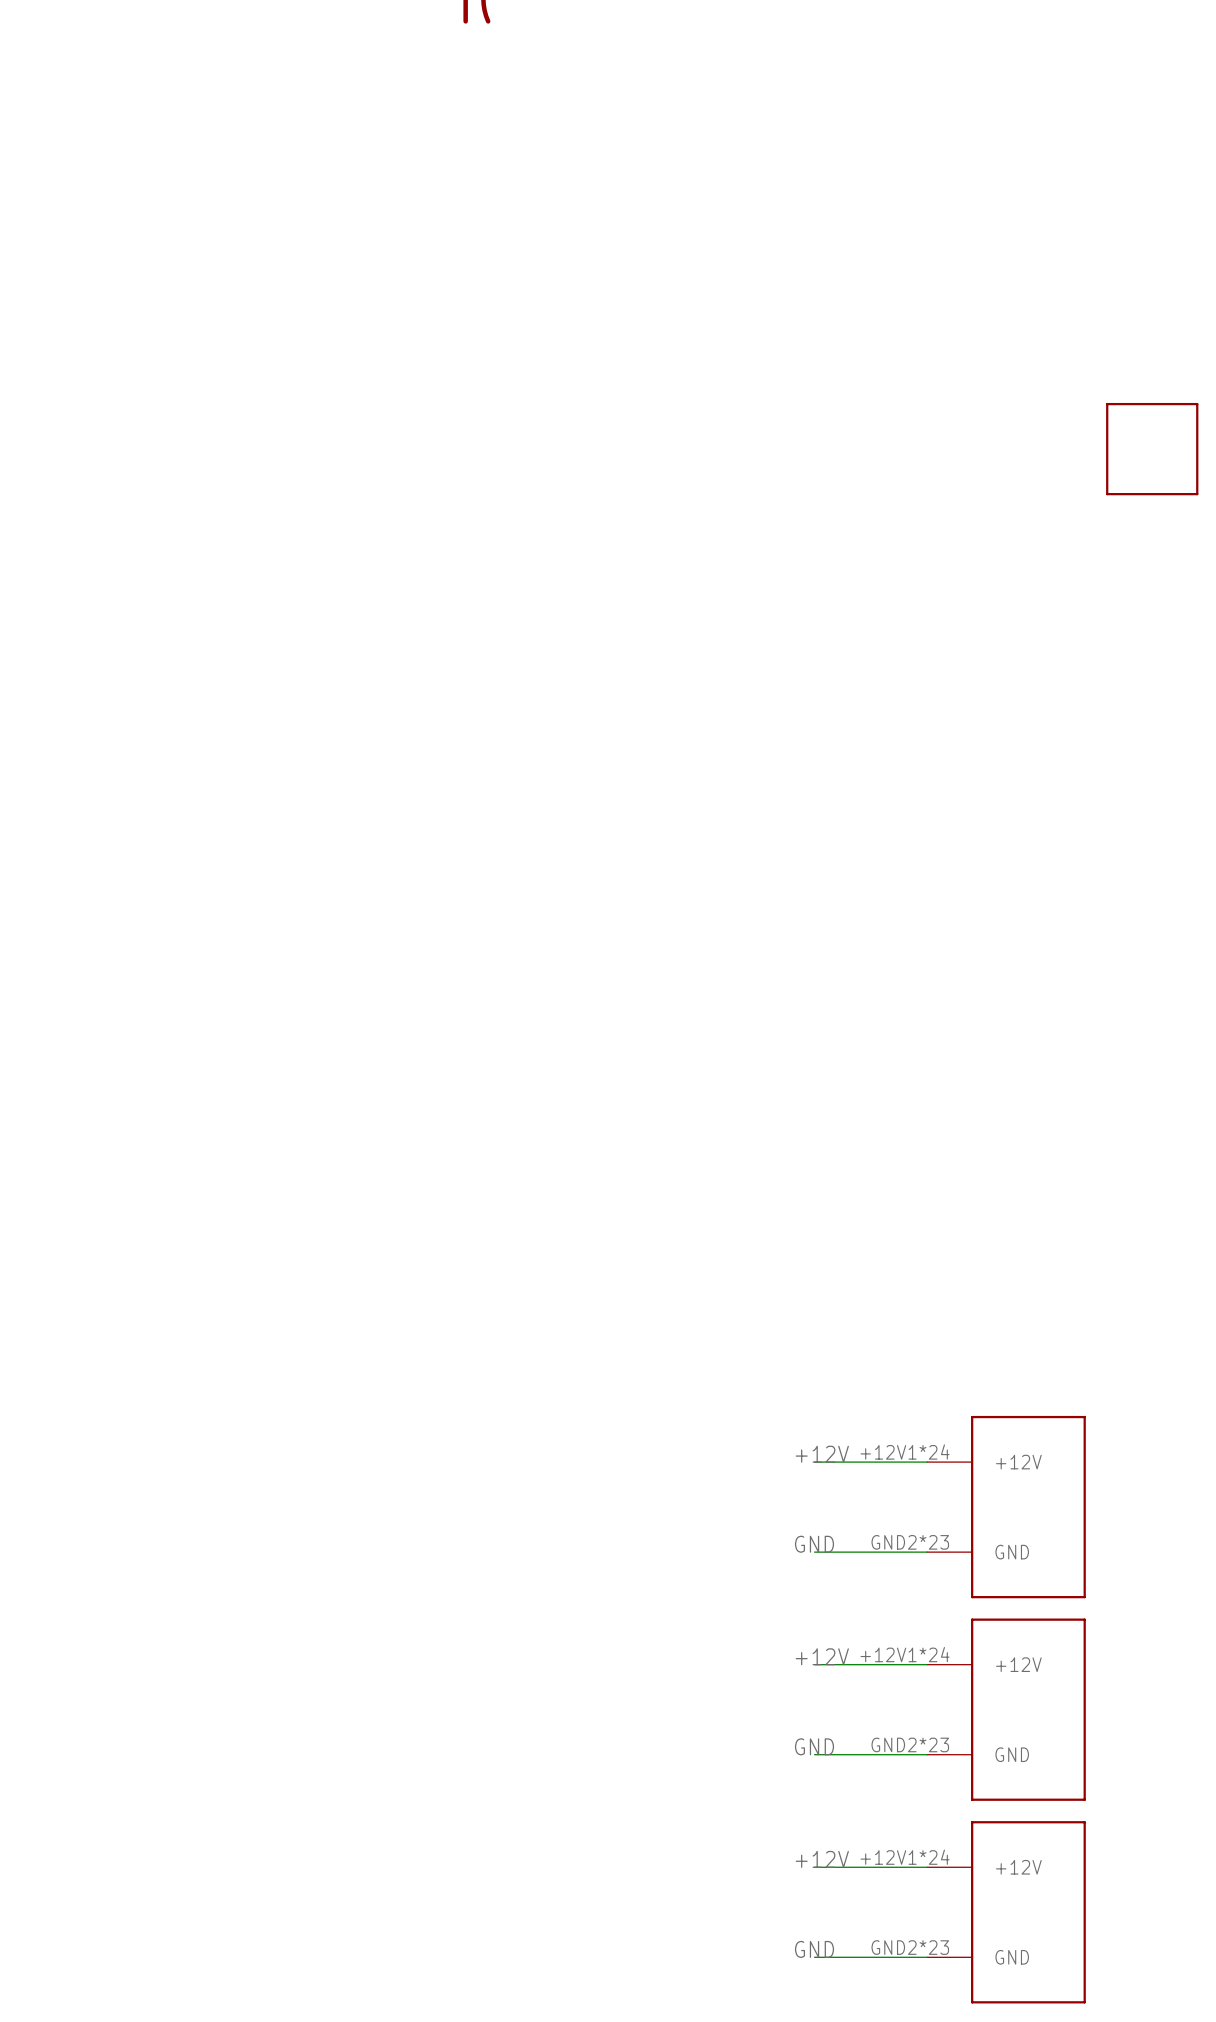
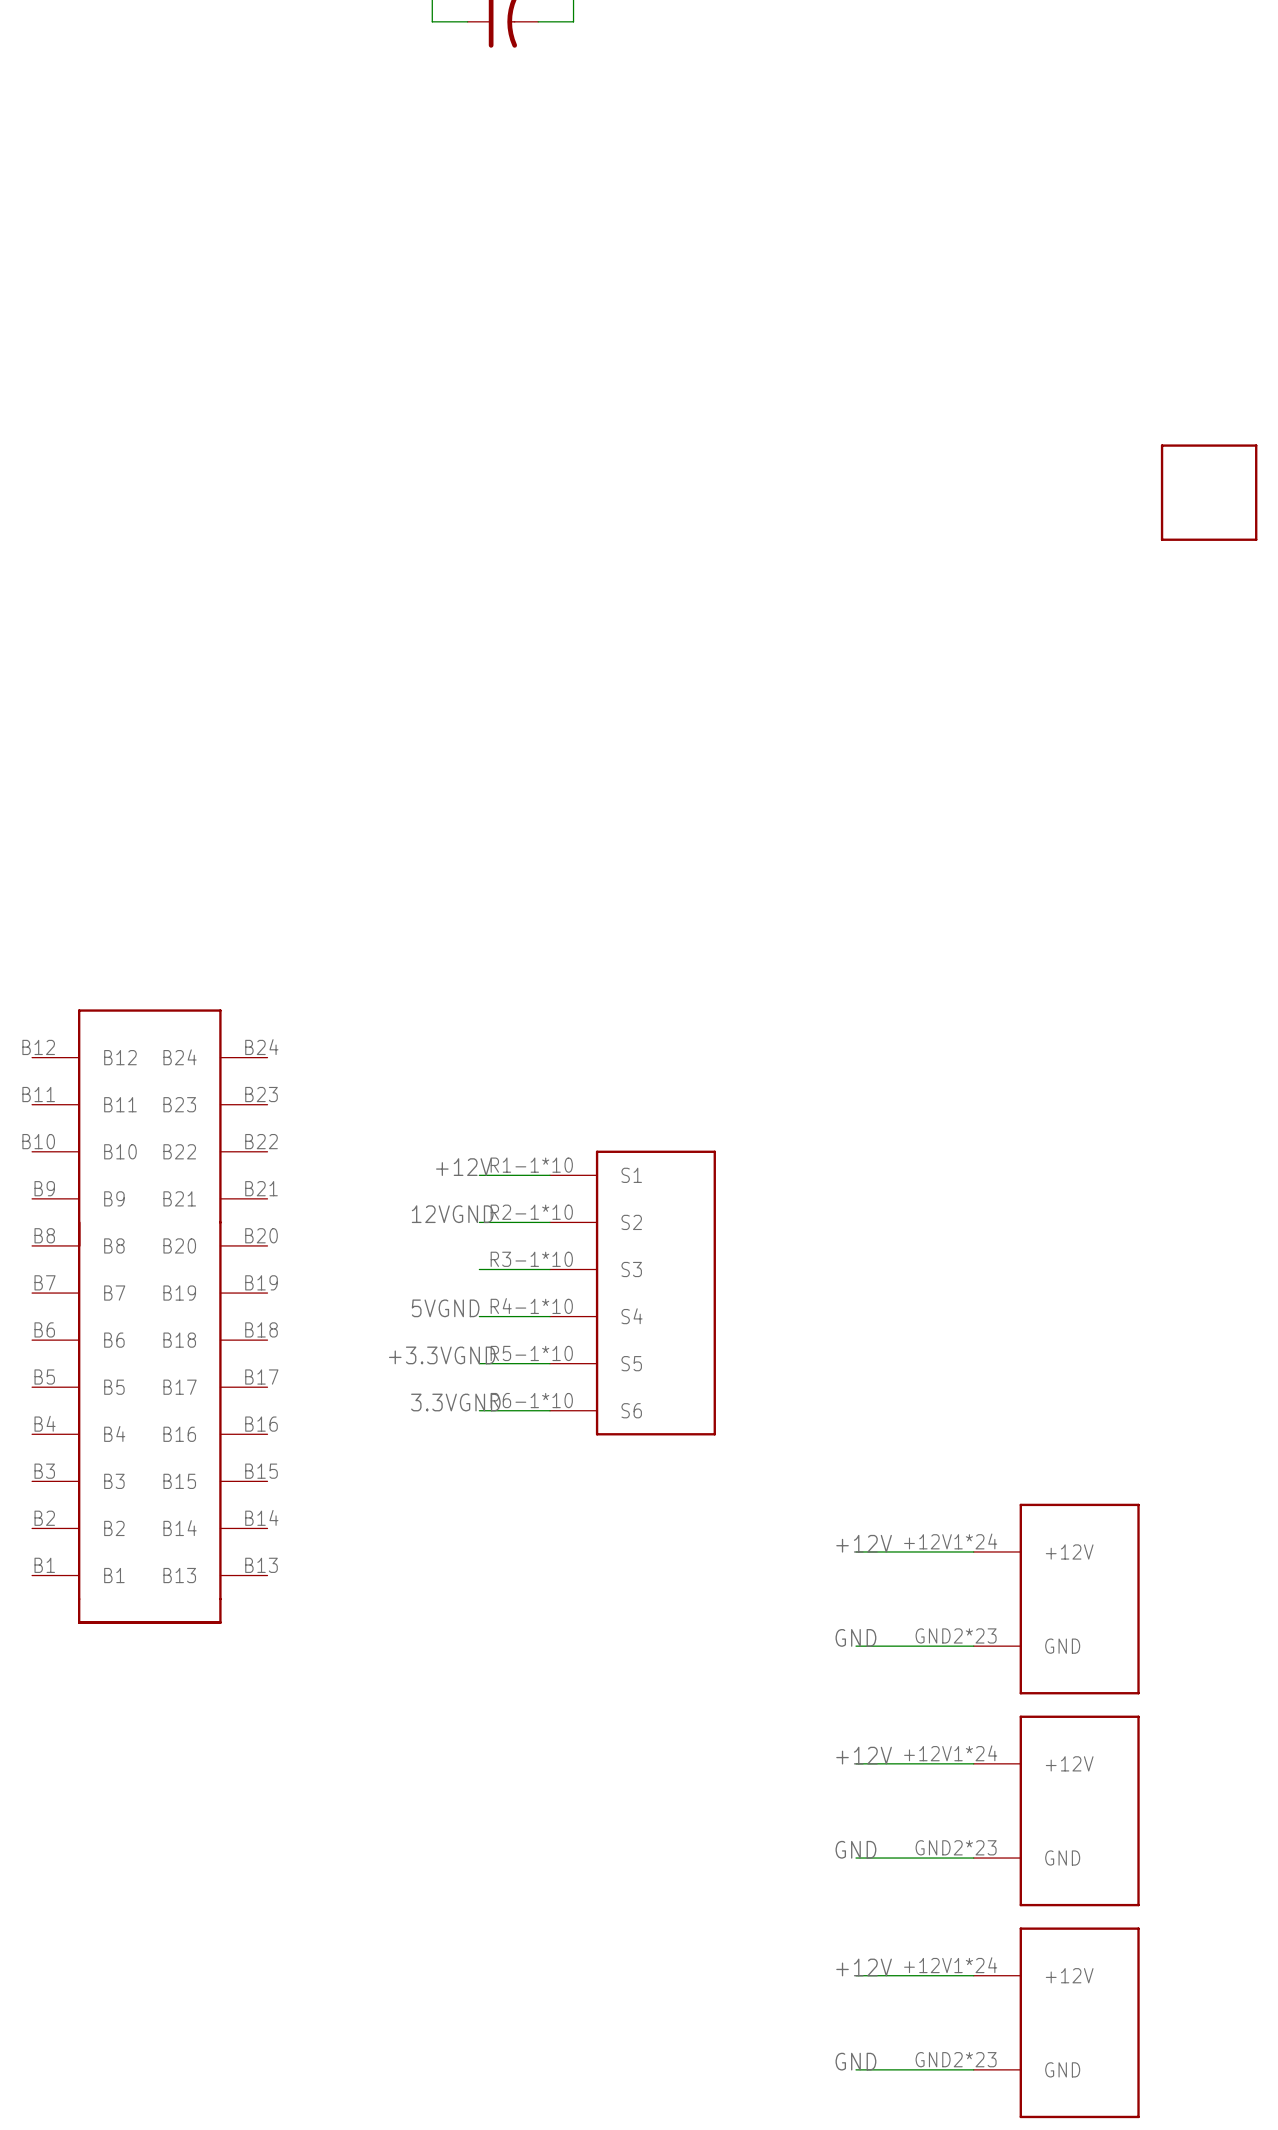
label: none -> +12V (463, 1167)
wire: none -> (479, 1175) (549, 1175)
label: none -> 12VGND (452, 1214)
wire: none -> (479, 1222) (549, 1222)
wire: none -> (479, 1269) (549, 1269)
part: none -> (632, 1293)
label: none -> 5VGND (445, 1308)
part: none -> (149, 1316)
wire: none -> (479, 1316) (549, 1316)
label: none -> +3.3VGND (442, 1355)
wire: none -> (479, 1363) (549, 1363)
label: none -> 3.3VGND (455, 1402)
wire: none -> (479, 1410) (549, 1410)

